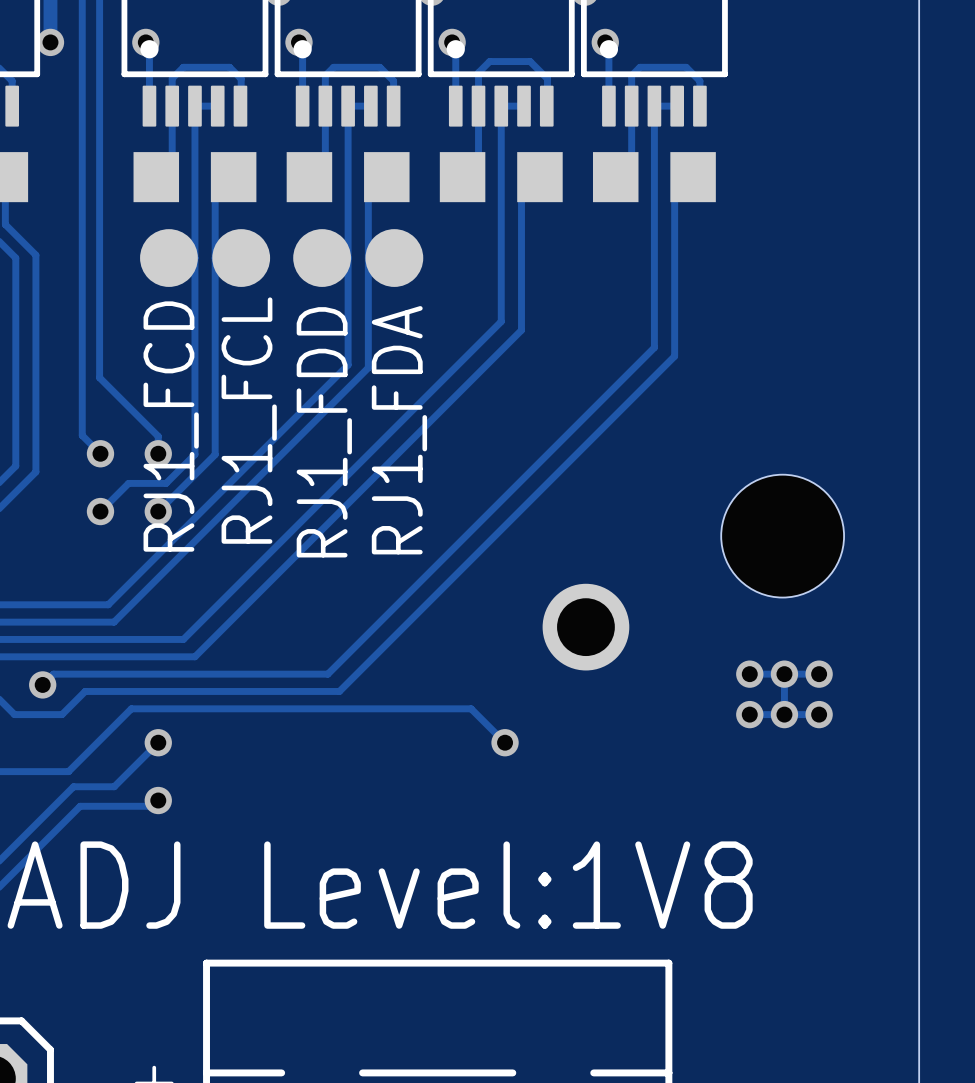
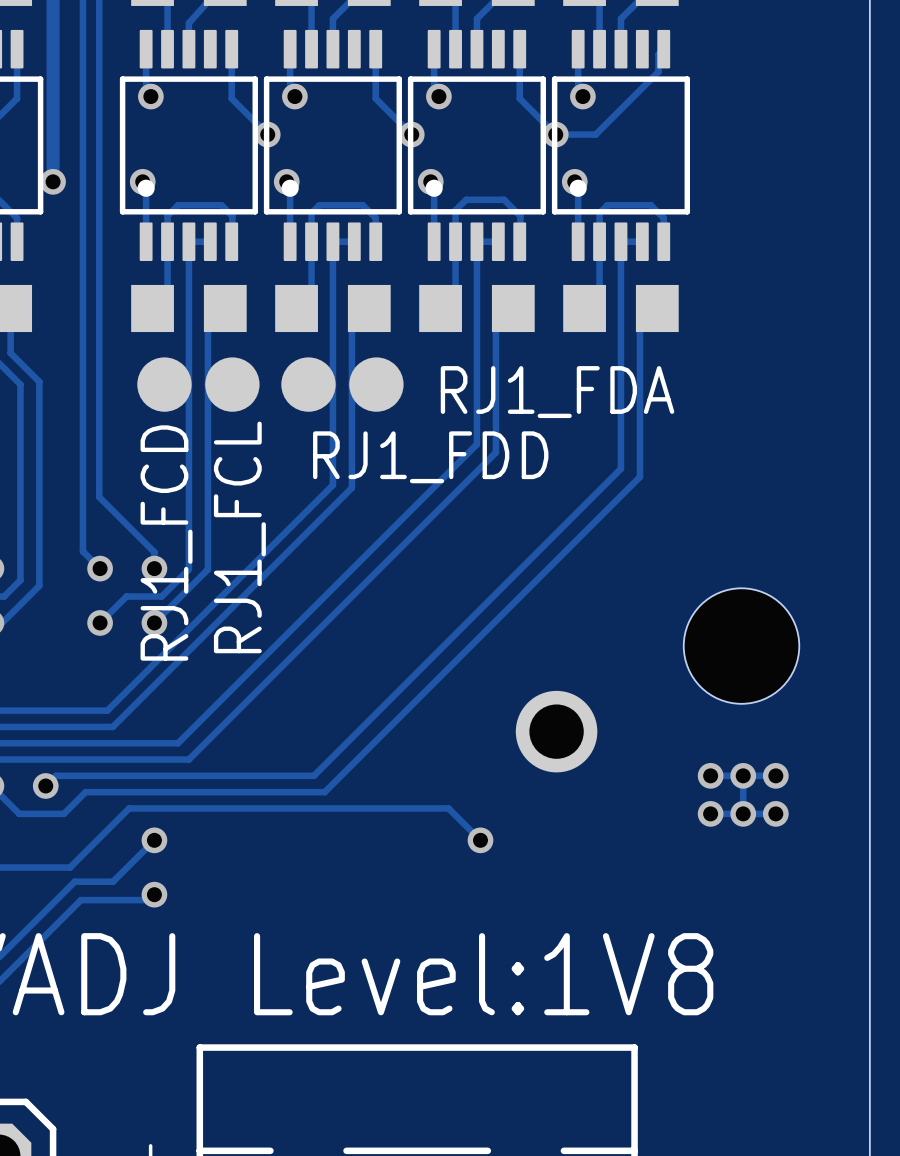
RJ1_FDA name rotation: 0° (399, 430) -> 90° clockwise (557, 392)
RJ1_FDD name rotation: 0° (324, 432) -> 90° clockwise (430, 457)

